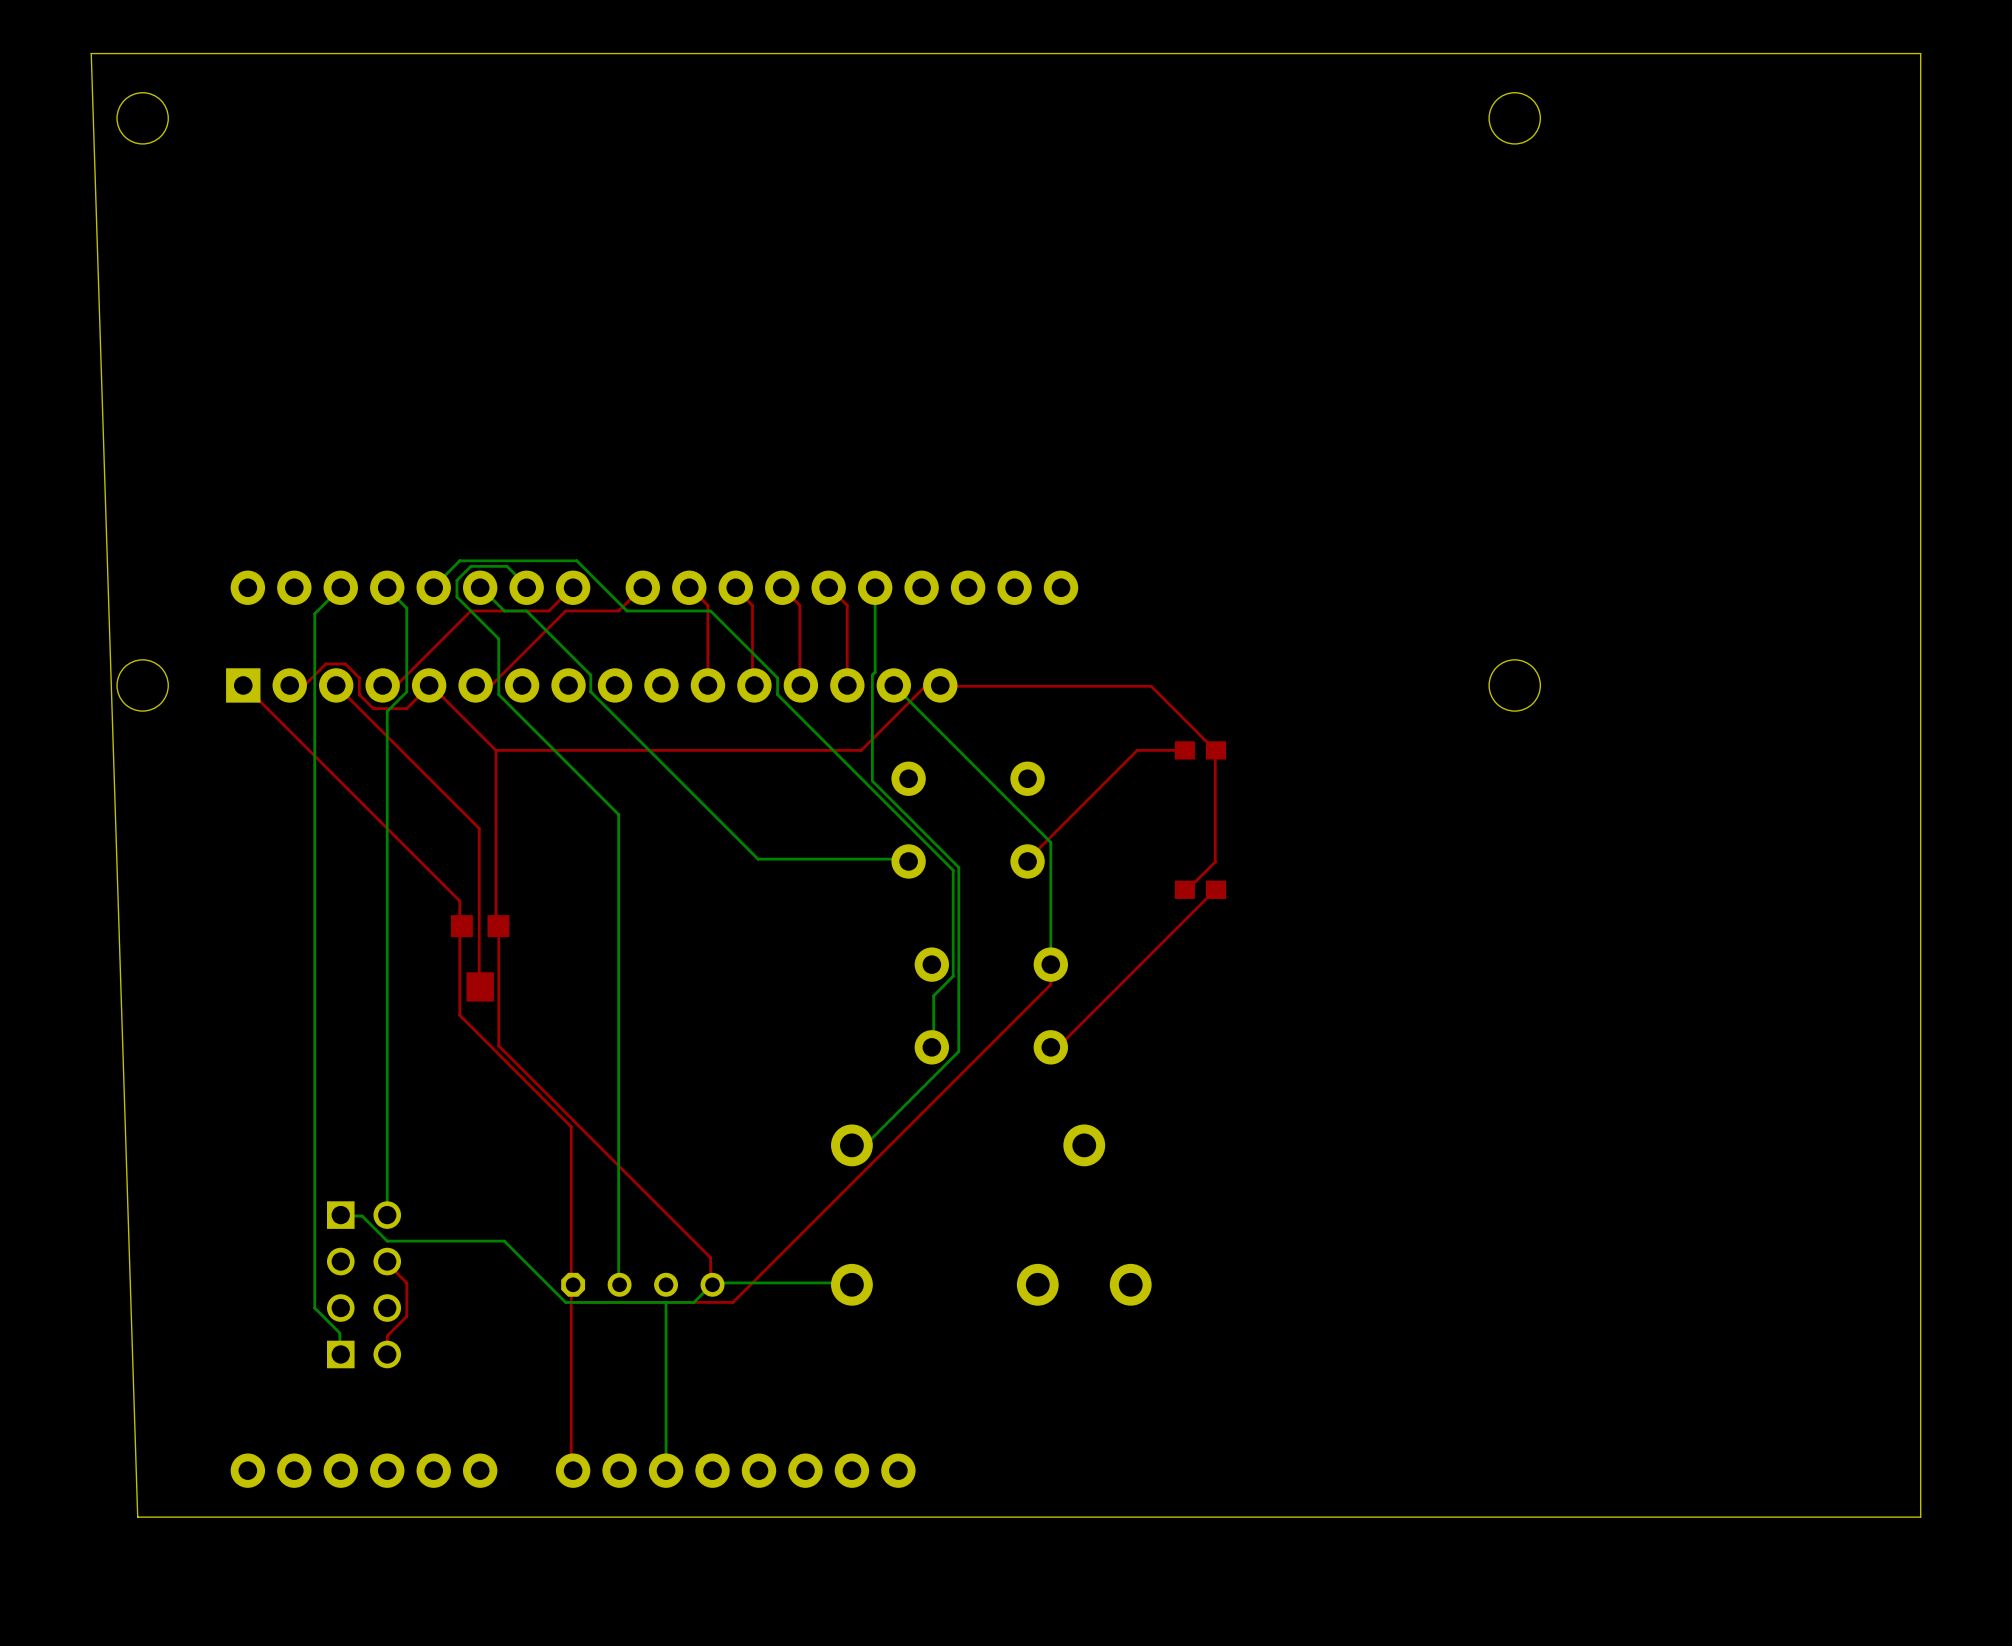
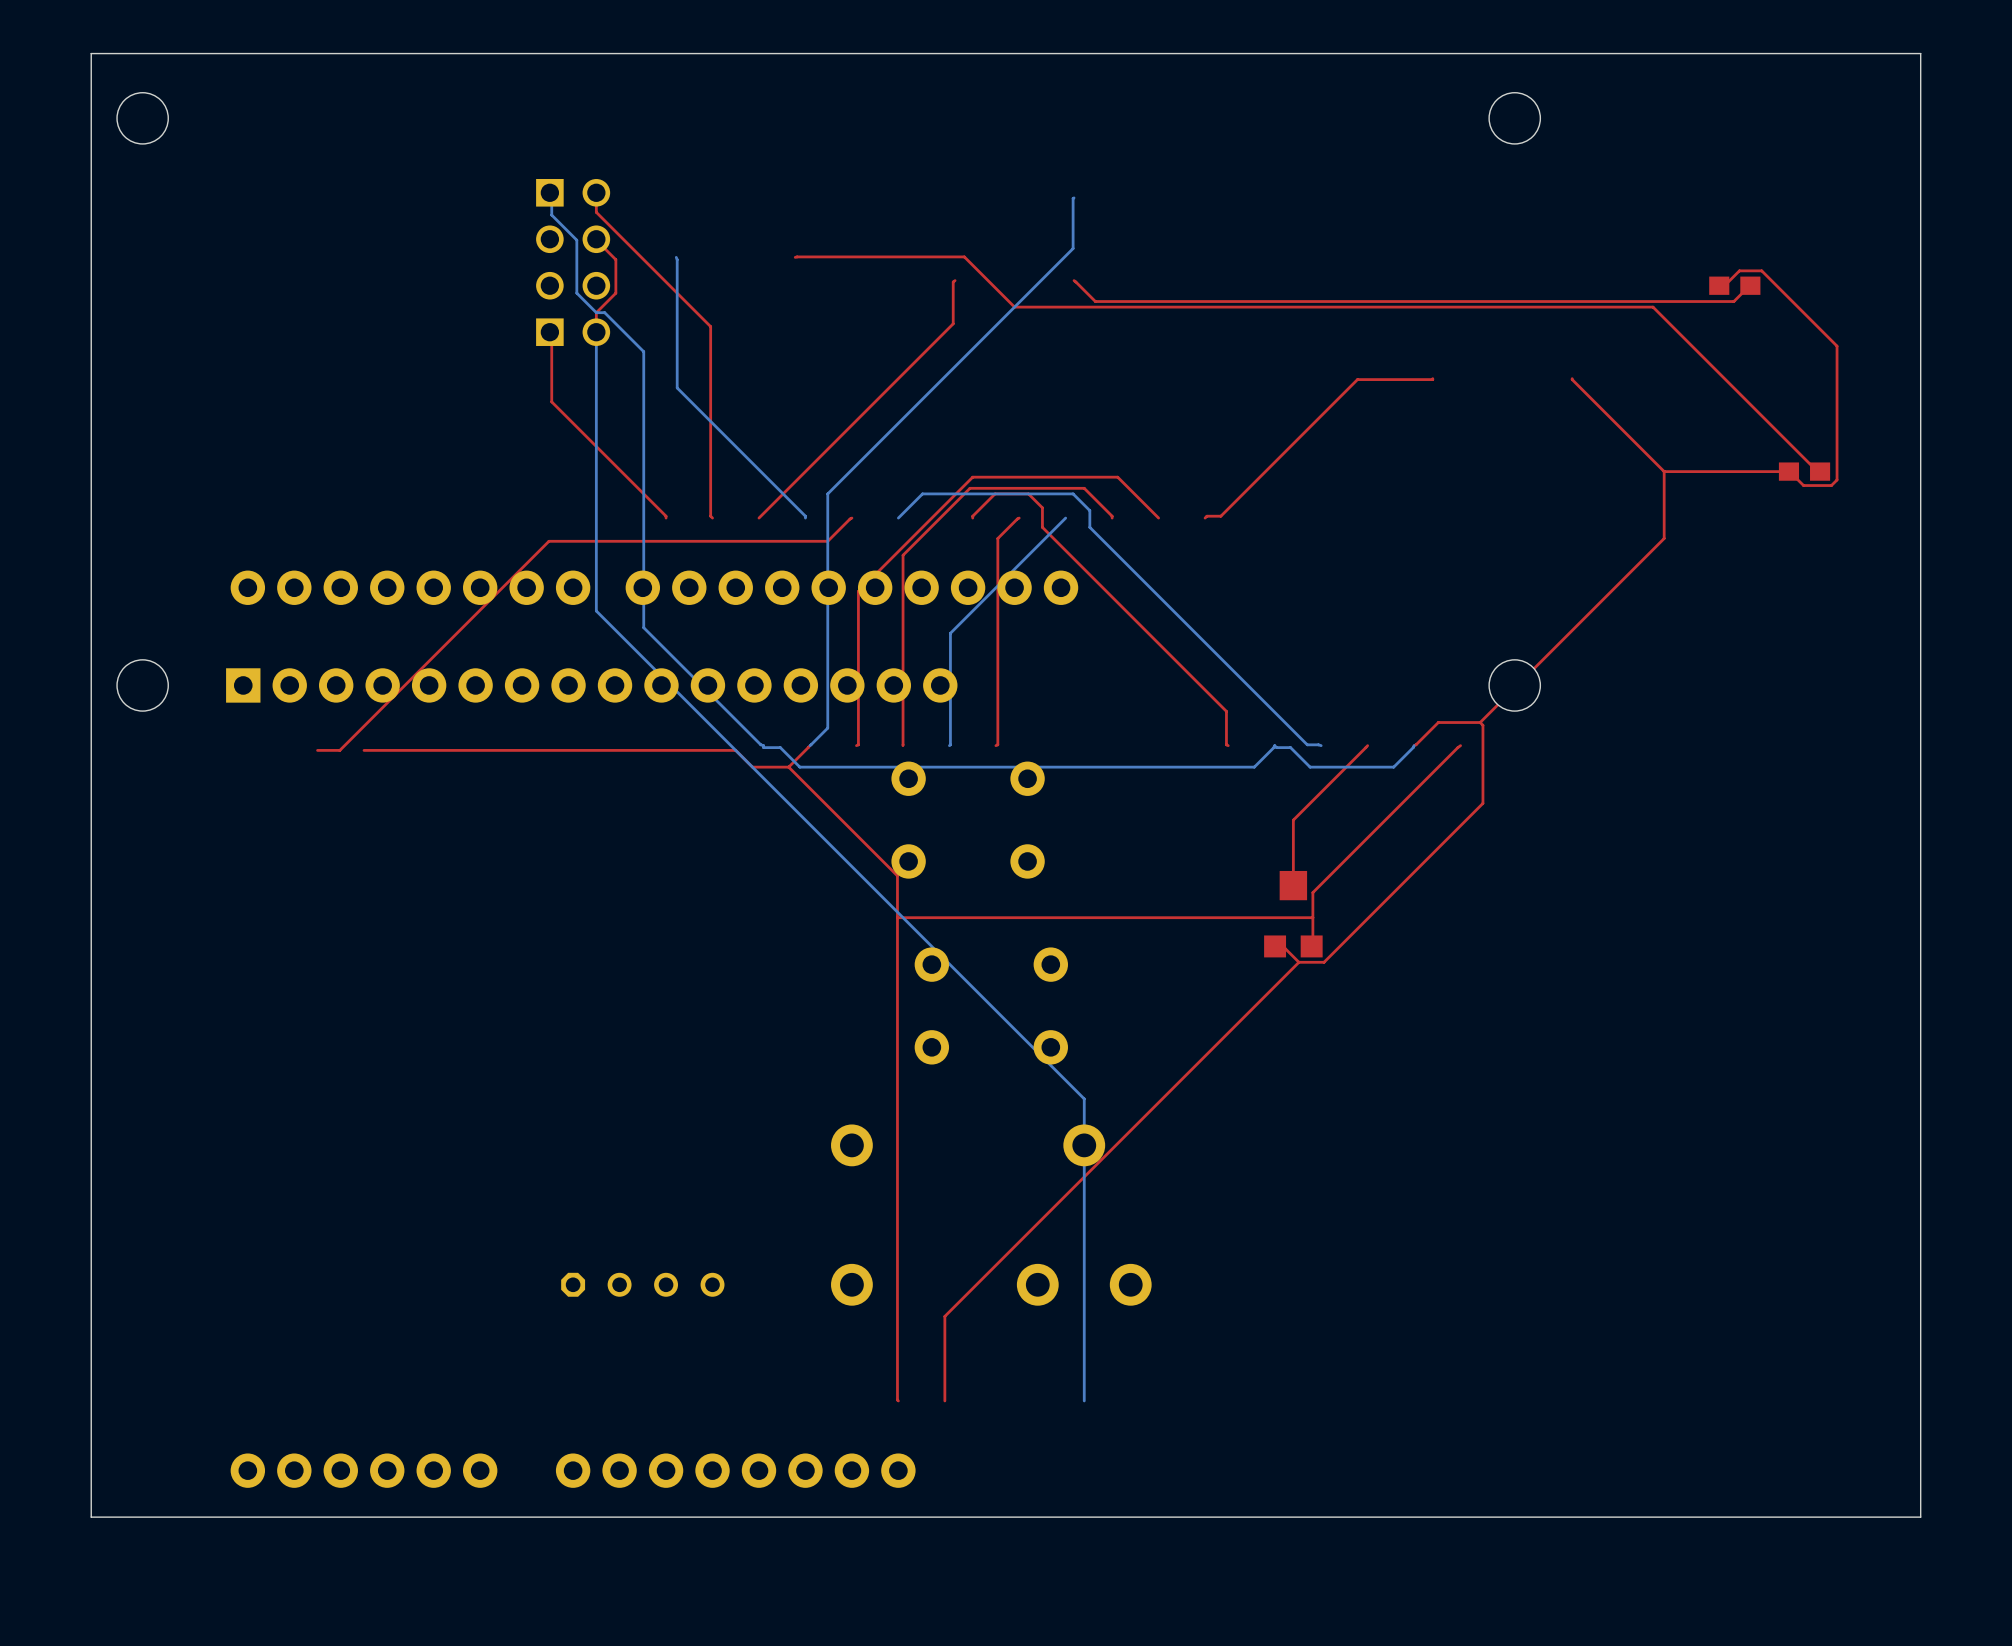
board edge: (91, 53) (137, 1517) -> (91, 53) (91, 1517) (137, 1517)
bottom track: none -> (549, 192) (551, 192) (551, 215) (576, 240) (576, 293) (596, 312) (604, 312) (643, 351) (643, 627) (763, 747) (780, 747) (799, 767) (1254, 767) (1274, 745) (1276, 747) (1290, 747) (1310, 767) (1393, 767) (1414, 745)
top track: none -> (596, 192) (596, 212) (710, 326) (710, 516) (712, 518)
bottom track: none -> (1074, 197) (1073, 248) (827, 493) (827, 728) (810, 745)
top track: none -> (596, 239) (615, 259) (615, 293) (596, 312) (596, 332)
bottom track: none -> (676, 257) (677, 387) (805, 518)
top track: none -> (795, 257) (964, 256) (1014, 307) (1653, 307) (1817, 471) (1820, 471)
part: none -> (573, 262)
top track: none -> (955, 280) (953, 282) (953, 323) (758, 518)
top track: none -> (1074, 280) (1095, 301) (1733, 301) (1750, 285)
top track: none -> (1719, 285) (1725, 284) (1739, 270) (1761, 270) (1837, 346) (1837, 479) (1831, 485) (1803, 485) (1789, 471) (1664, 471)
part: none -> (1734, 285)
top track: none -> (549, 332) (551, 332) (551, 401) (666, 518)
bottom track: none -> (596, 332) (596, 611) (1084, 1098) (1084, 1400)
top track: none -> (1432, 378) (1357, 379) (1220, 516) (1206, 516) (1205, 518)
top track: none -> (1572, 378) (1664, 471)
top track: none -> (1664, 471) (1664, 538) (1480, 722)
part: none -> (1804, 471)
top track: none -> (851, 518) (827, 541) (548, 541) (339, 750) (317, 750)
bottom track: none -> (898, 518) (922, 493) (1073, 493) (1089, 510) (1089, 527) (1307, 744) (1321, 745)
top track: none -> (972, 518) (995, 493) (1028, 493) (1042, 507) (1042, 527) (1226, 711) (1226, 744) (1228, 745)
top track: none -> (1019, 518) (997, 538) (997, 744) (995, 745)
bottom track: none -> (1065, 518) (950, 633) (949, 745)
top track: none -> (1112, 518) (1084, 488) (969, 488) (903, 555) (902, 745)
top track: none -> (1158, 518) (1117, 477) (972, 477) (858, 591) (858, 744) (856, 745)
bottom track: (340, 587) (314, 613) (314, 1308) (339, 1333) (340, 1354) -> none
bottom track: (387, 587) (406, 608) (406, 691) (387, 711) (387, 1215) -> none
bottom track: (433, 587) (459, 560) (576, 560) (627, 611) (710, 611) (777, 677) (777, 694) (953, 870) (953, 976) (933, 995) (933, 1045) (931, 1047) -> none
bottom track: (480, 587) (504, 611) (526, 611) (590, 675) (590, 691) (758, 859) (908, 859) (908, 861) -> none
bottom track: (526, 587) (507, 566) (470, 566) (456, 580) (456, 597) (498, 638) (498, 694) (618, 814) (619, 1284) -> none
top track: (573, 587) (548, 611) (470, 611) (398, 683) (384, 683) (382, 685) -> none
top track: (642, 587) (618, 611) (565, 611) (493, 683) (476, 683) (475, 685) -> none
top track: (689, 587) (707, 605) (707, 685) -> none
top track: (735, 587) (752, 605) (752, 683) (754, 685) -> none
top track: (782, 587) (799, 605) (800, 685) -> none
top track: (828, 587) (847, 605) (847, 685) -> none
bottom track: (875, 587) (875, 672) (872, 675) (872, 781) (958, 867) (958, 1051) (866, 1143) (852, 1143) (851, 1145) -> none
top track: (243, 685) (459, 900) (459, 926) (461, 926) (459, 928) (459, 1015) (571, 1126) (571, 1282) (573, 1284) (571, 1285) (571, 1469) (573, 1470) -> none
top track: (289, 685) (292, 683) (306, 683) (325, 663) (345, 663) (359, 677) (359, 694) (373, 708) (406, 708) (429, 685) (431, 686) (495, 750) (495, 926) (498, 926) (498, 928) (498, 1045) (710, 1257) (710, 1282) (712, 1284) -> none
top track: (336, 685) (479, 828) (480, 986) -> none
bottom track: (893, 685) (1050, 842) (1050, 964) -> none
top track: none -> (1480, 722) (1482, 725) (1482, 803) (1324, 962) (1298, 962)
top track: none -> (1480, 722) (1438, 722) (1414, 745)
top track: none -> (810, 745) (788, 767)
top track: none -> (1367, 745) (1293, 820) (1293, 885)
top track: none -> (1460, 745) (1312, 892) (1311, 946)
top track: none -> (495, 750) (364, 750)
top track: (1184, 750) (1137, 750) (1027, 861) -> none
part: (1200, 750) -> none
top track: (1215, 750) (1151, 686) (940, 685) (925, 686) (861, 750) (735, 750) -> (788, 767) (752, 767) (735, 750)
top track: (1215, 750) (1215, 861) (1187, 889) (1184, 889) -> none
top track: none -> (788, 767) (897, 875) (898, 1400)
part: (1200, 889) -> none
top track: (1215, 889) (1059, 1045) (1050, 1047) -> none
part: none -> (1293, 914)
top track: none -> (1312, 917) (897, 917)
top track: none -> (1275, 946) (1276, 948) (1285, 948) (1298, 962)
part: (480, 958) -> none
top track: none -> (1298, 962) (944, 1316) (944, 1400)
top track: (1050, 964) (1050, 984) (732, 1302) (571, 1302) -> none
bottom track: (340, 1215) (362, 1216) (387, 1241) (504, 1241) (565, 1302) (693, 1302) (713, 1282) (850, 1282) (851, 1284) -> none
top track: (387, 1261) (406, 1282) (406, 1316) (387, 1335) (387, 1354) -> none
part: (364, 1284) -> none
bottom track: (666, 1302) (666, 1470) -> none

